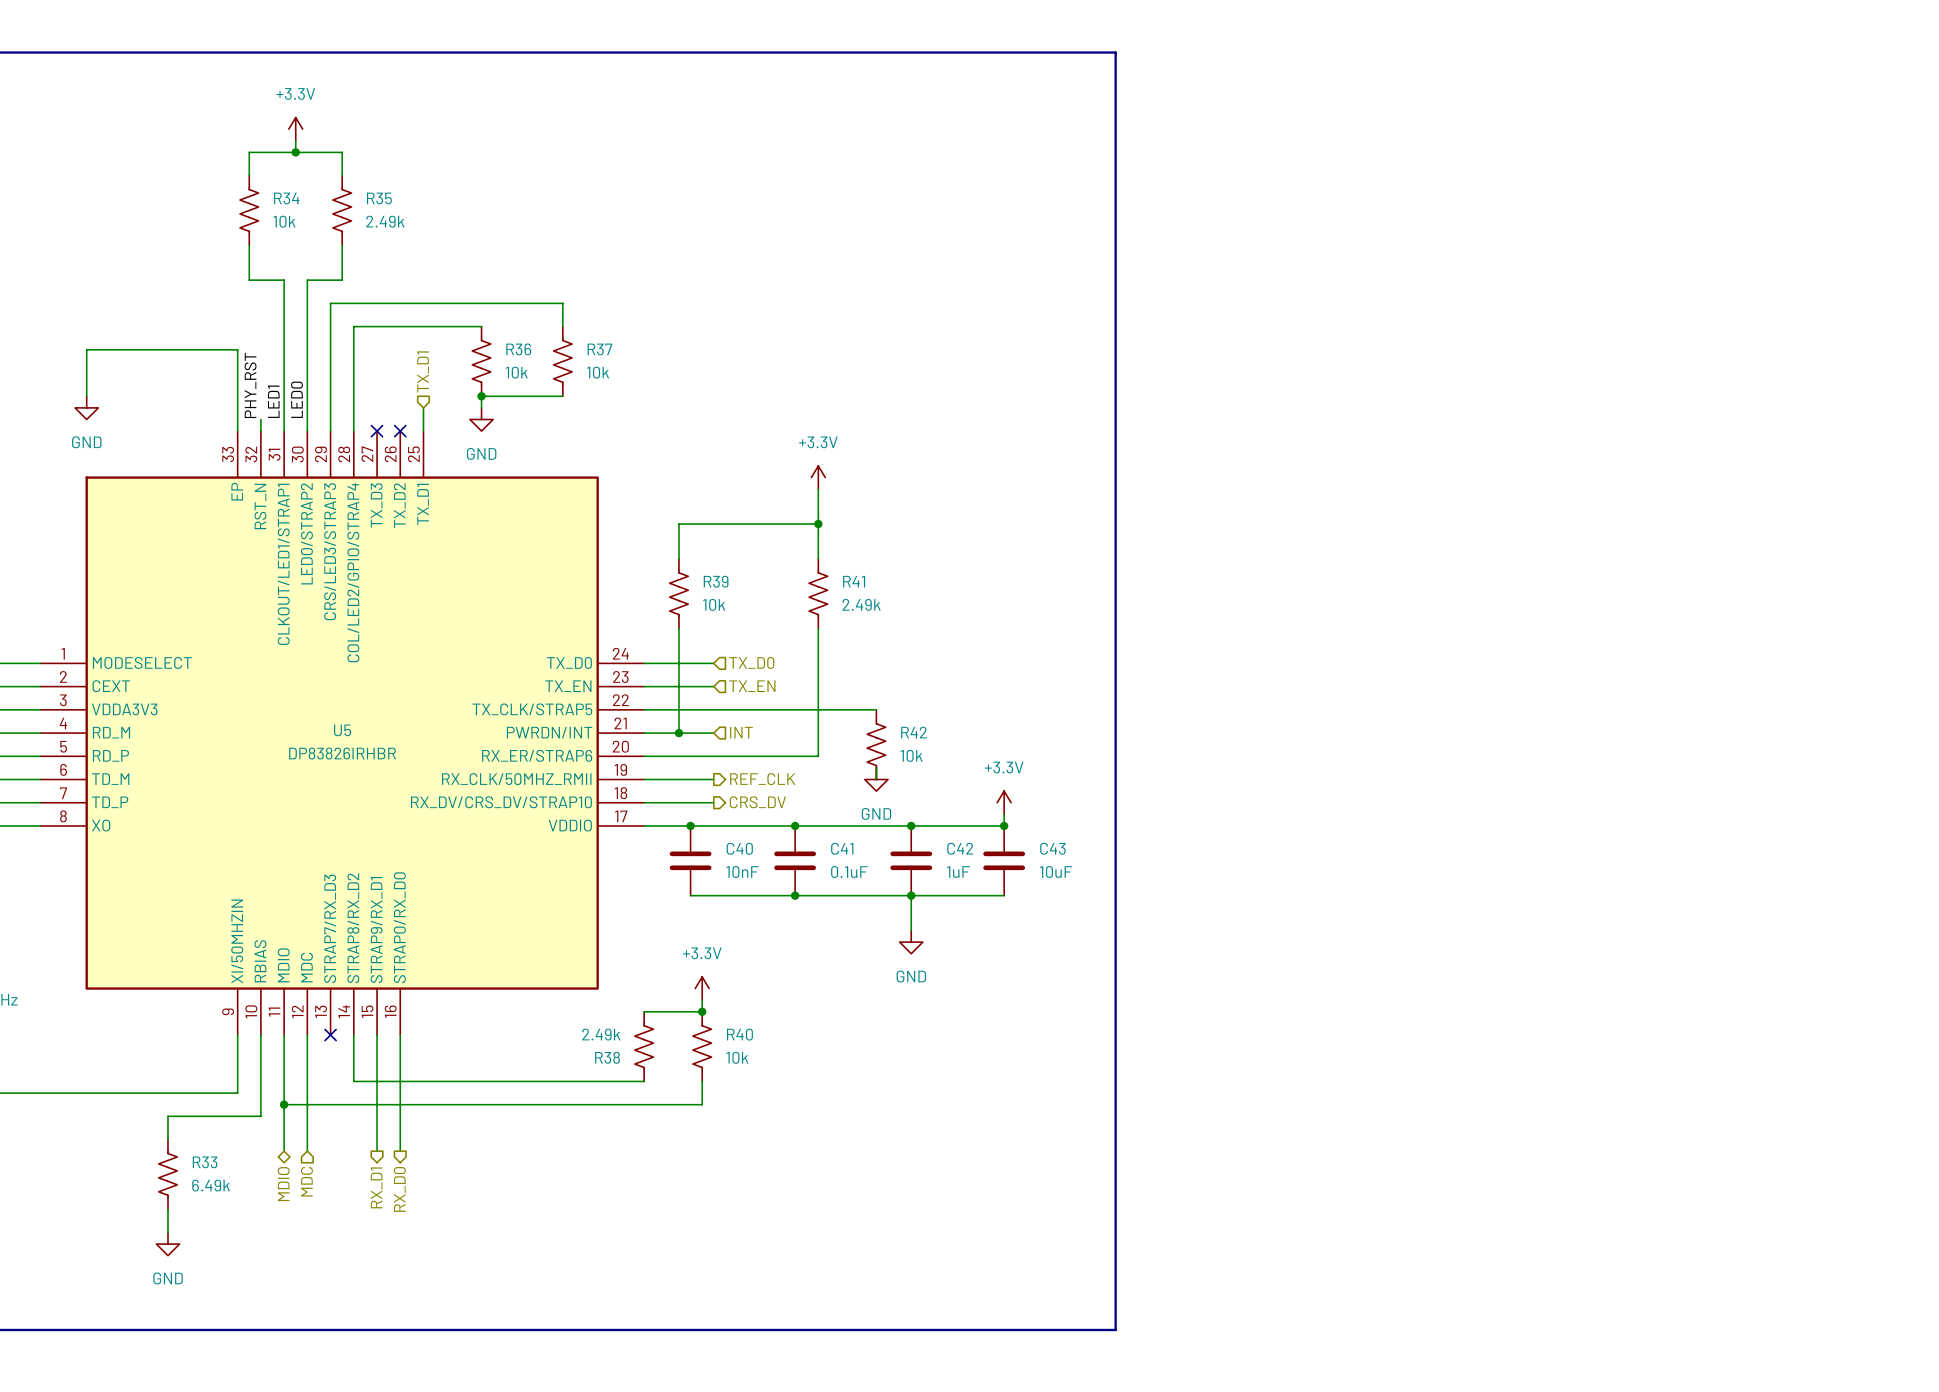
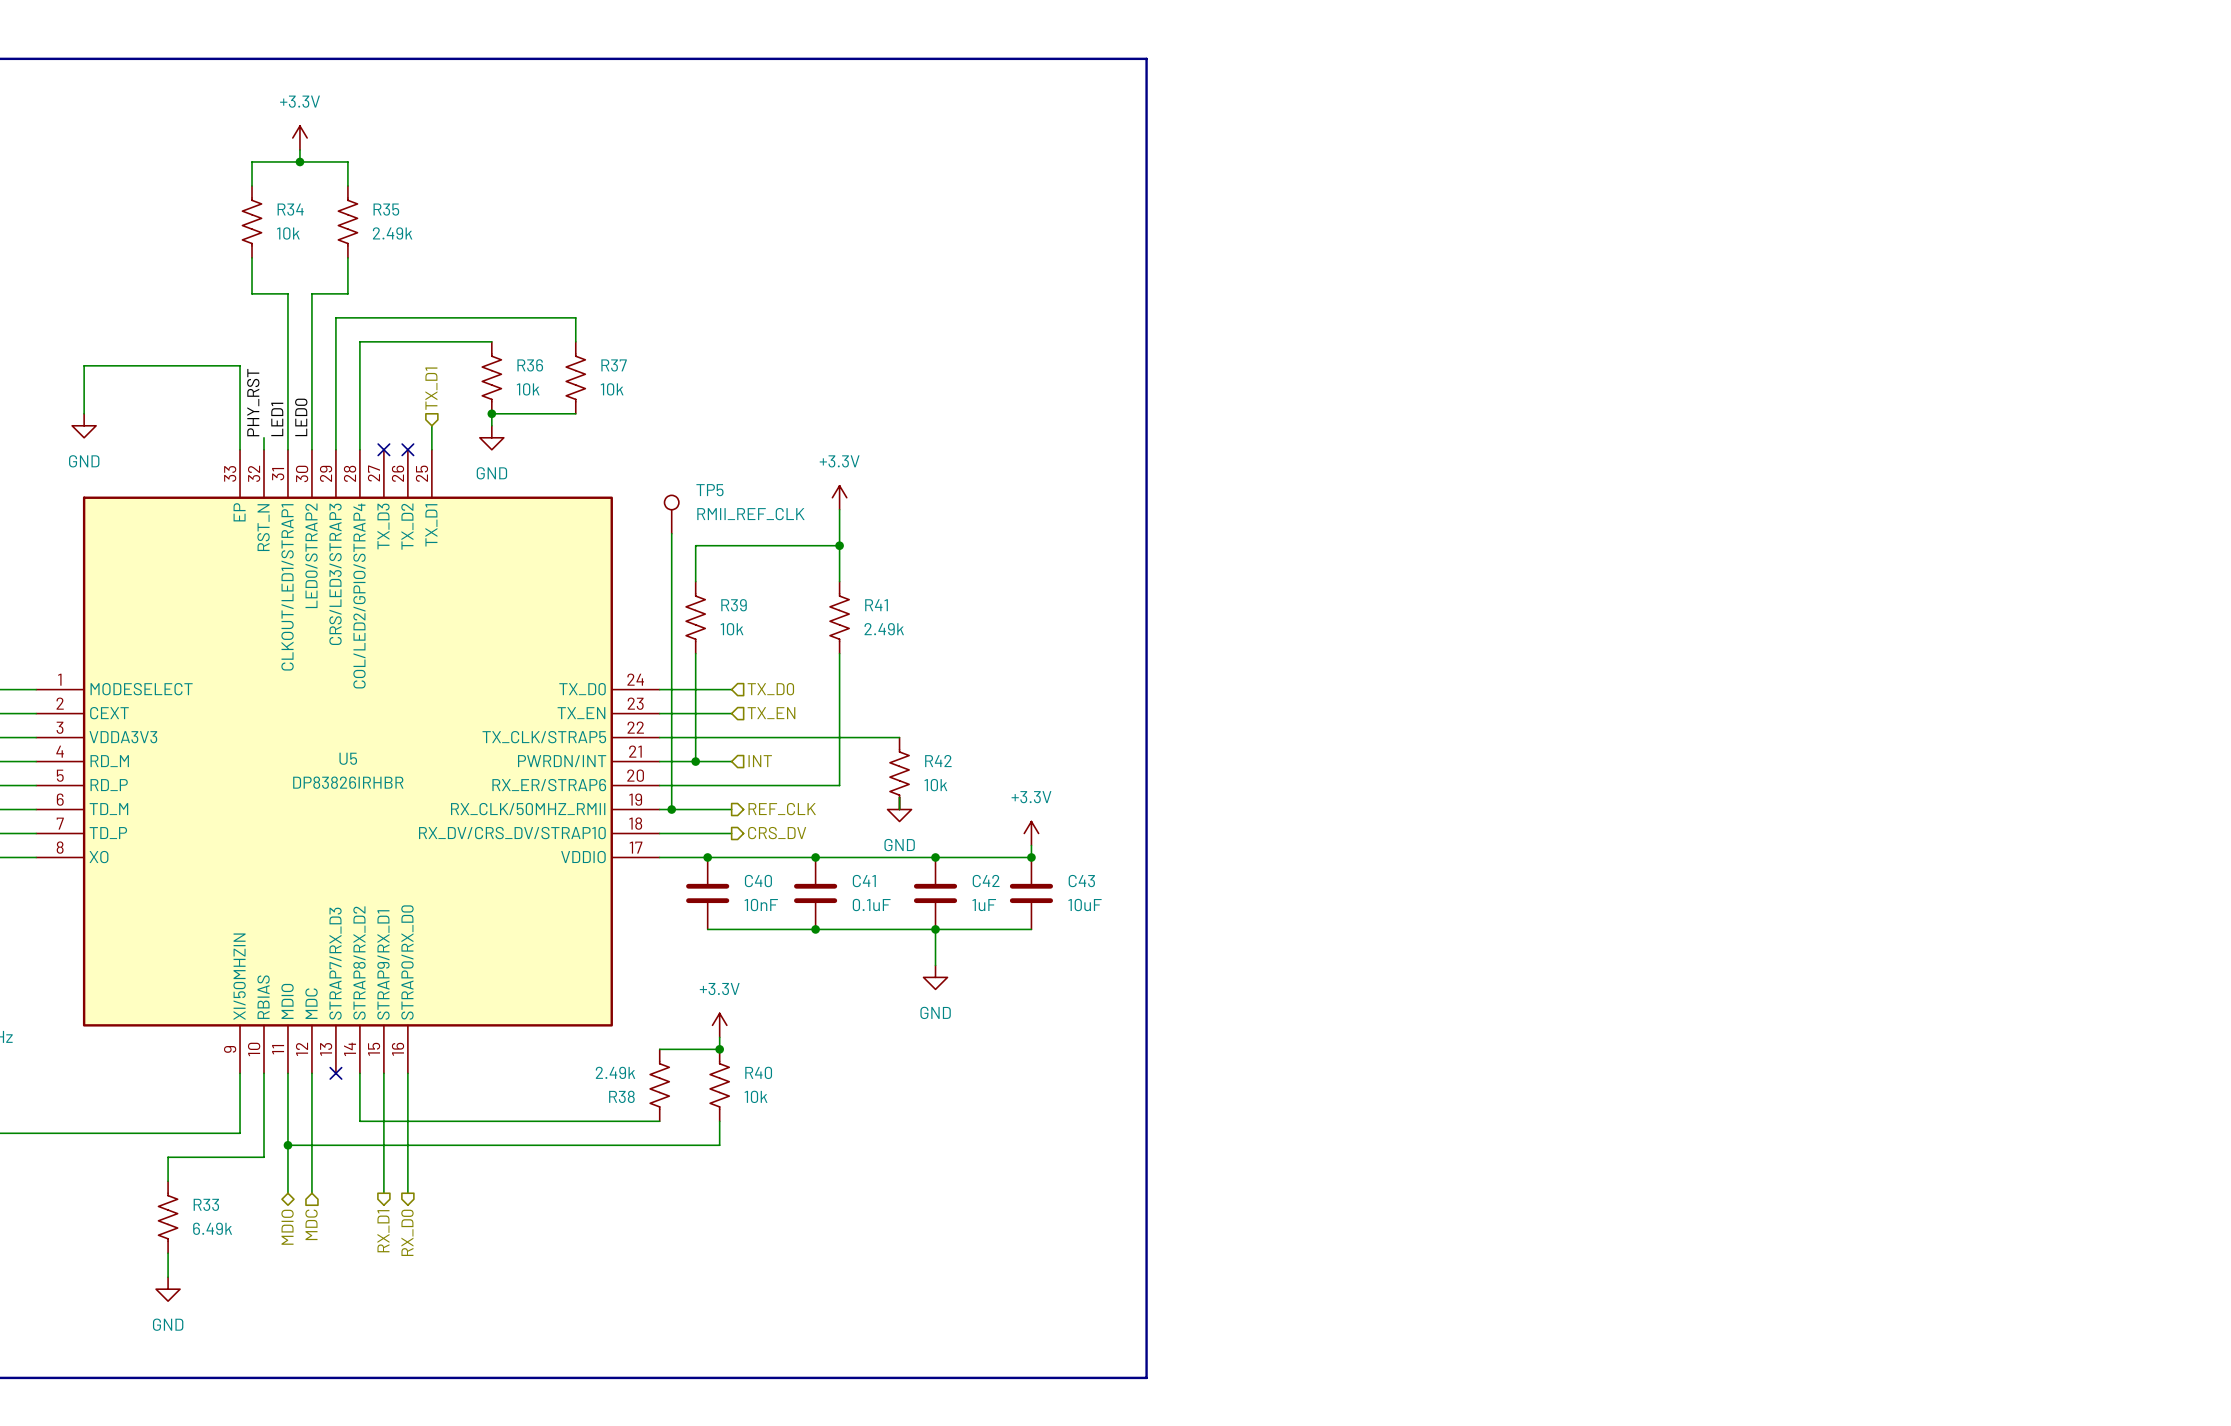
TP5: none -> RMII_REF_CLK (671, 514)
wire: none -> (671, 533) (671, 809)
junction: none -> (671, 809)

